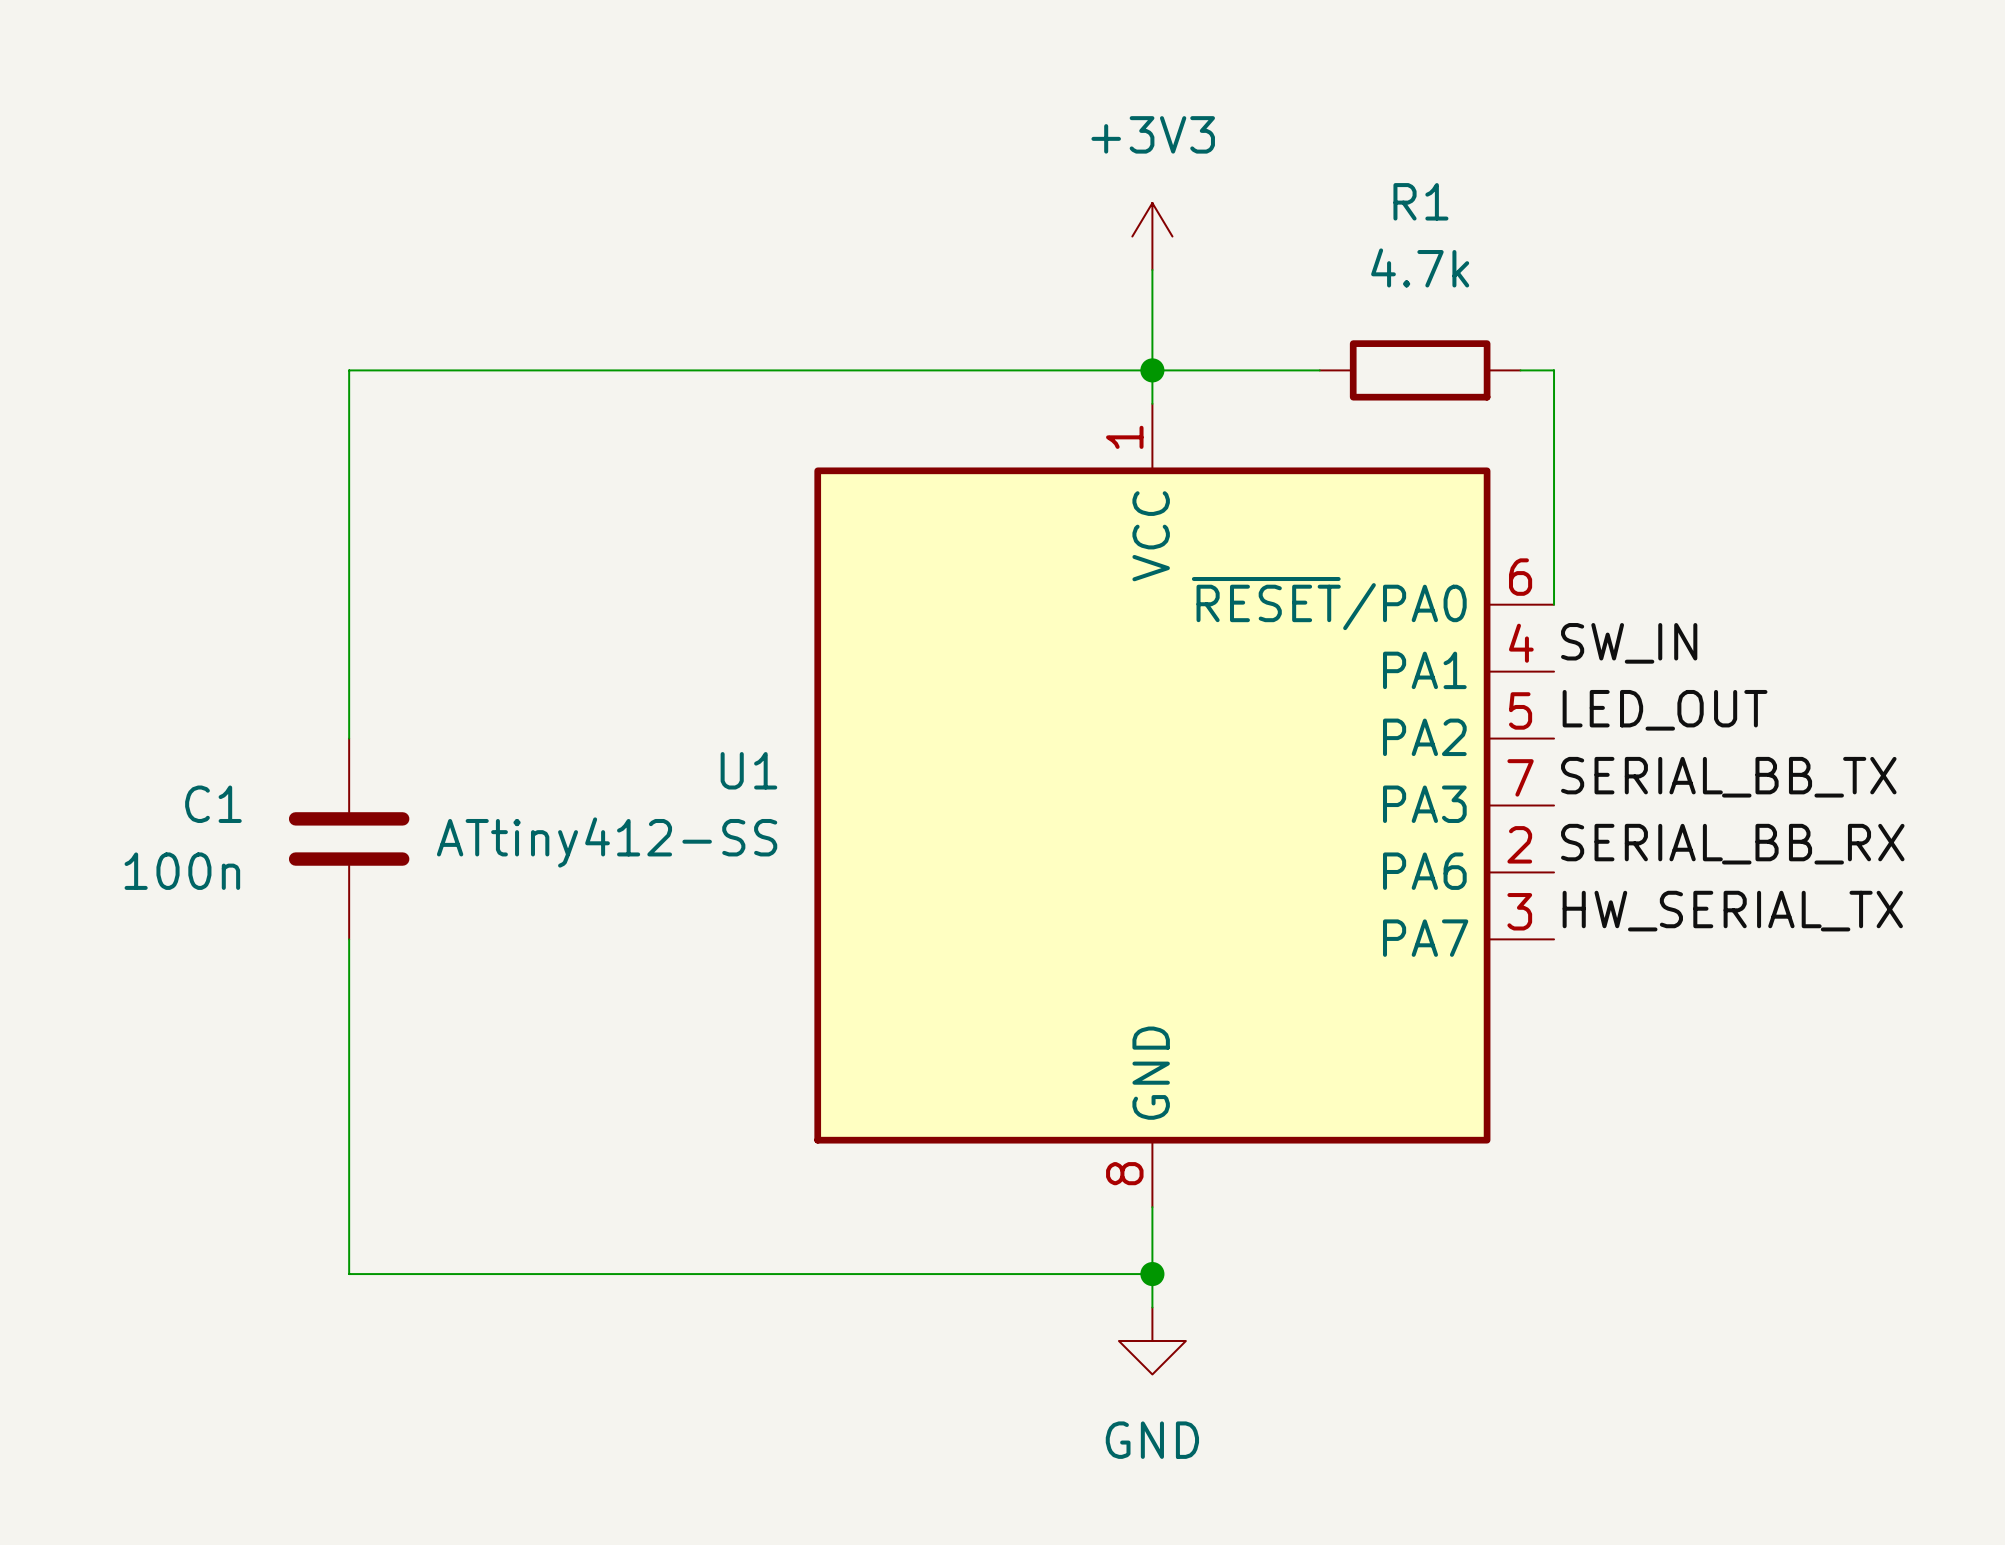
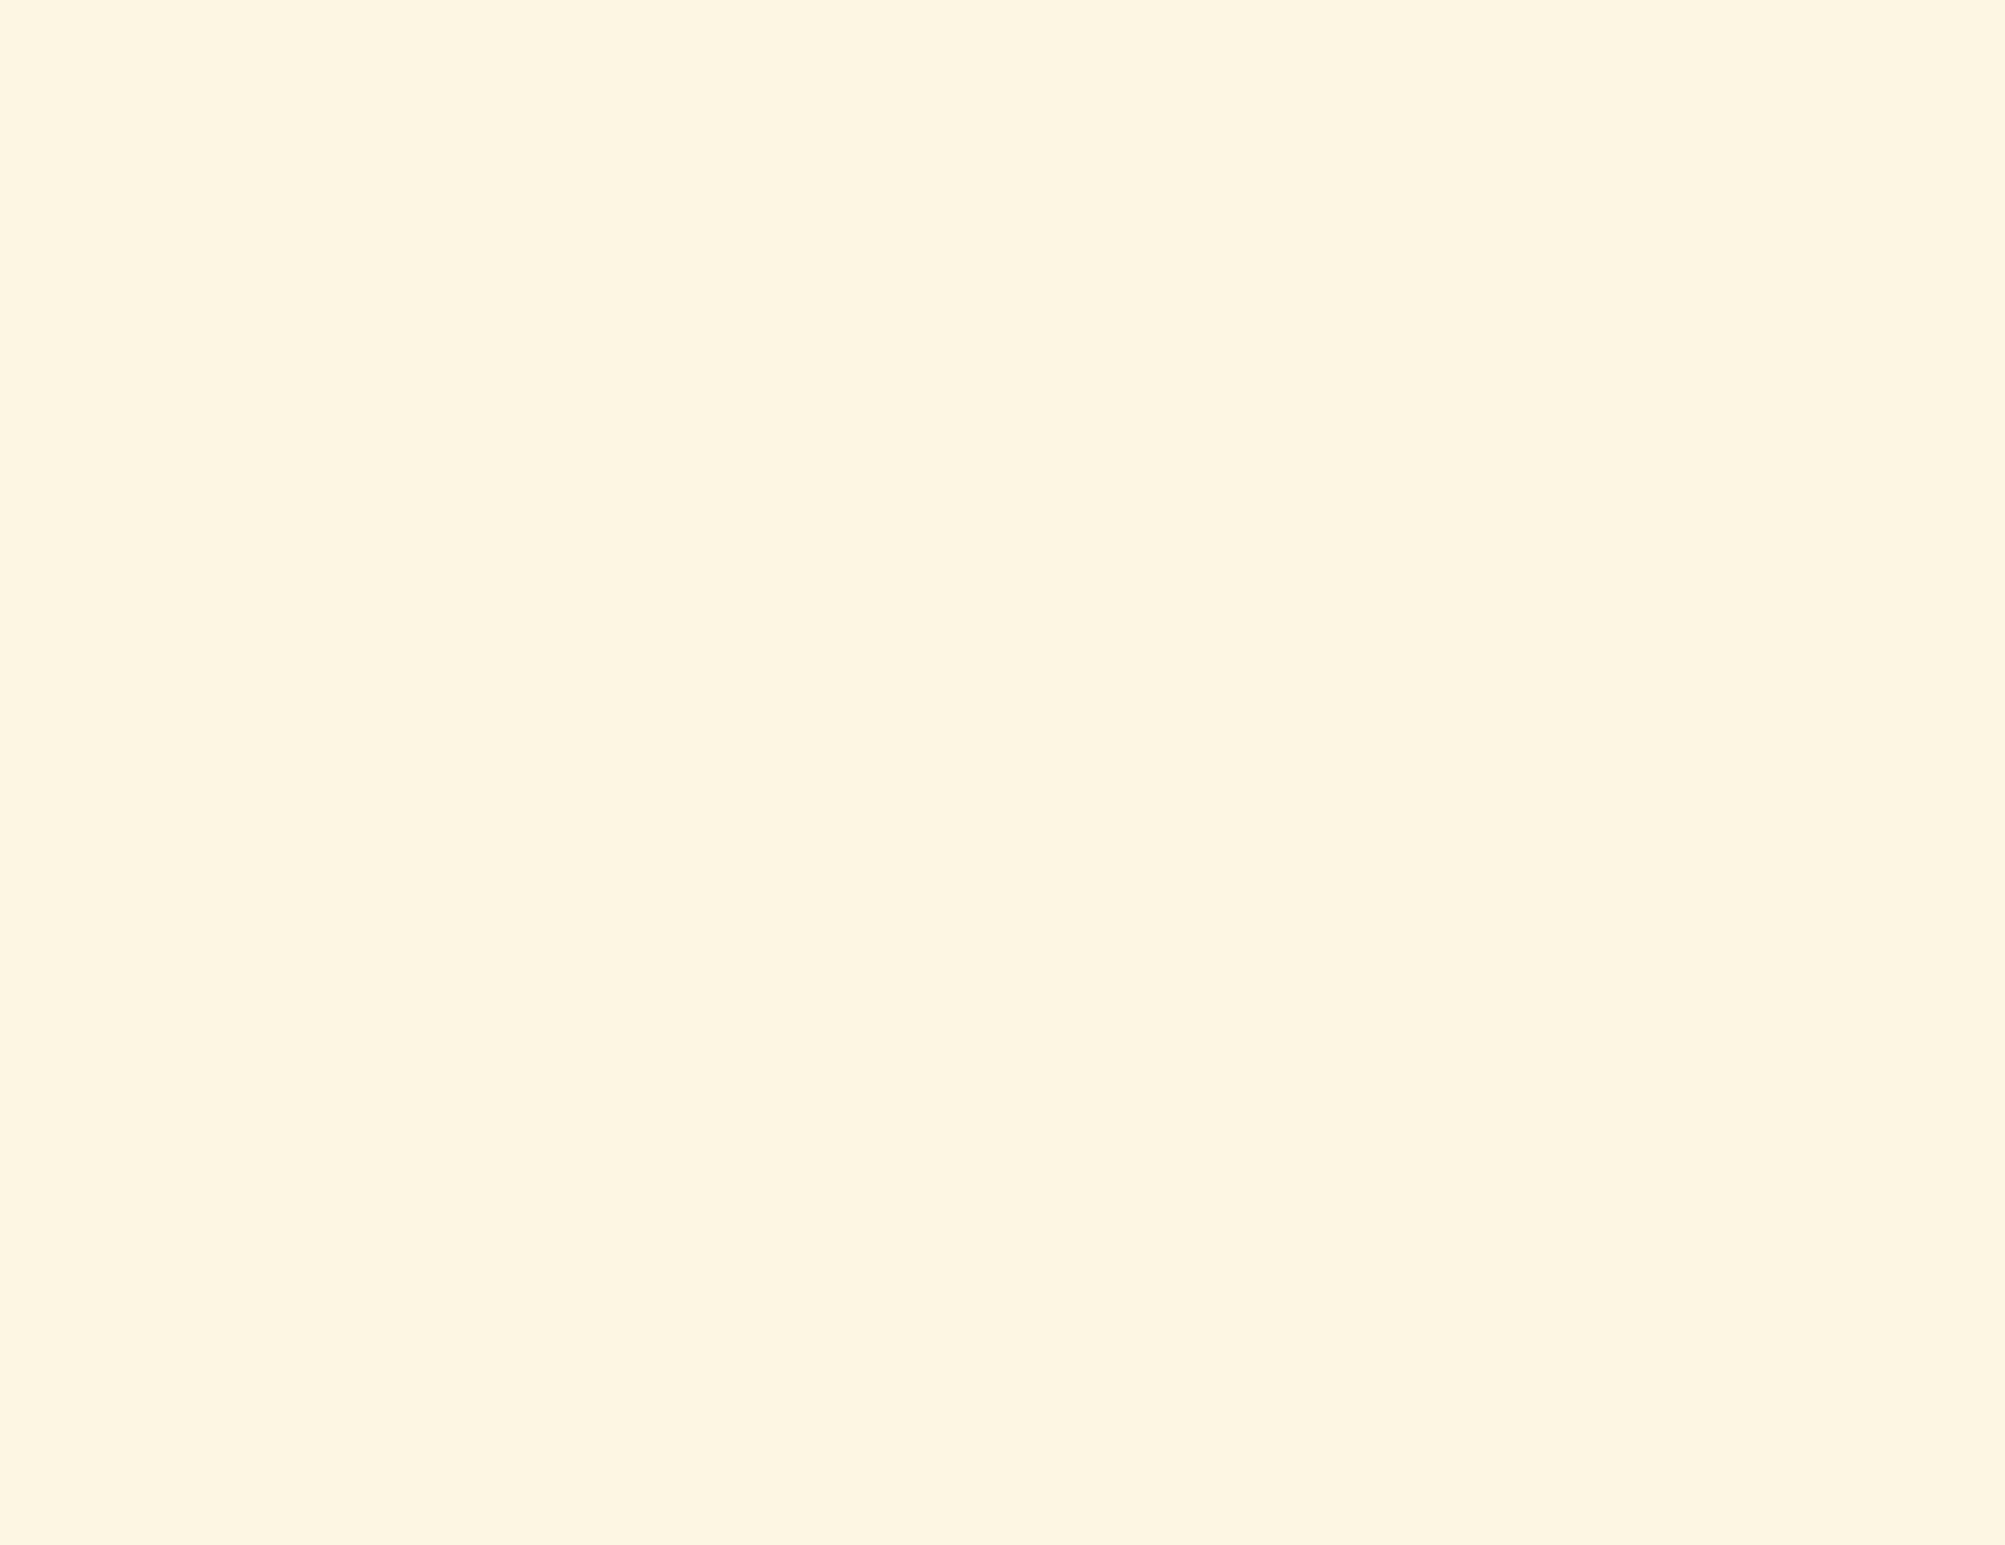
power symbol: +3V3 (1152, 236) -> none
wire: (1152, 270) (1152, 403) -> none
junction: (1152, 370) -> none
wire: (1319, 370) (349, 370) (349, 738) -> none
R1: 4.7k (1420, 370) -> none
wire: (1520, 370) (1554, 370) (1554, 604) -> none
label: SW_IN (1629, 643) -> none
label: LED_OUT (1665, 710) -> none
label: SERIAL_BB_TX (1728, 777) -> none
U1: ATtiny412-SS (1184, 805) -> none
C1: 100n (349, 838) -> none
label: SERIAL_BB_RX (1732, 844) -> none
label: HW_SERIAL_TX (1732, 911) -> none
wire: (349, 939) (349, 1274) (1152, 1274) -> none
wire: (1152, 1207) (1152, 1307) -> none
junction: (1152, 1274) -> none
power symbol: GND (1152, 1341) -> none

